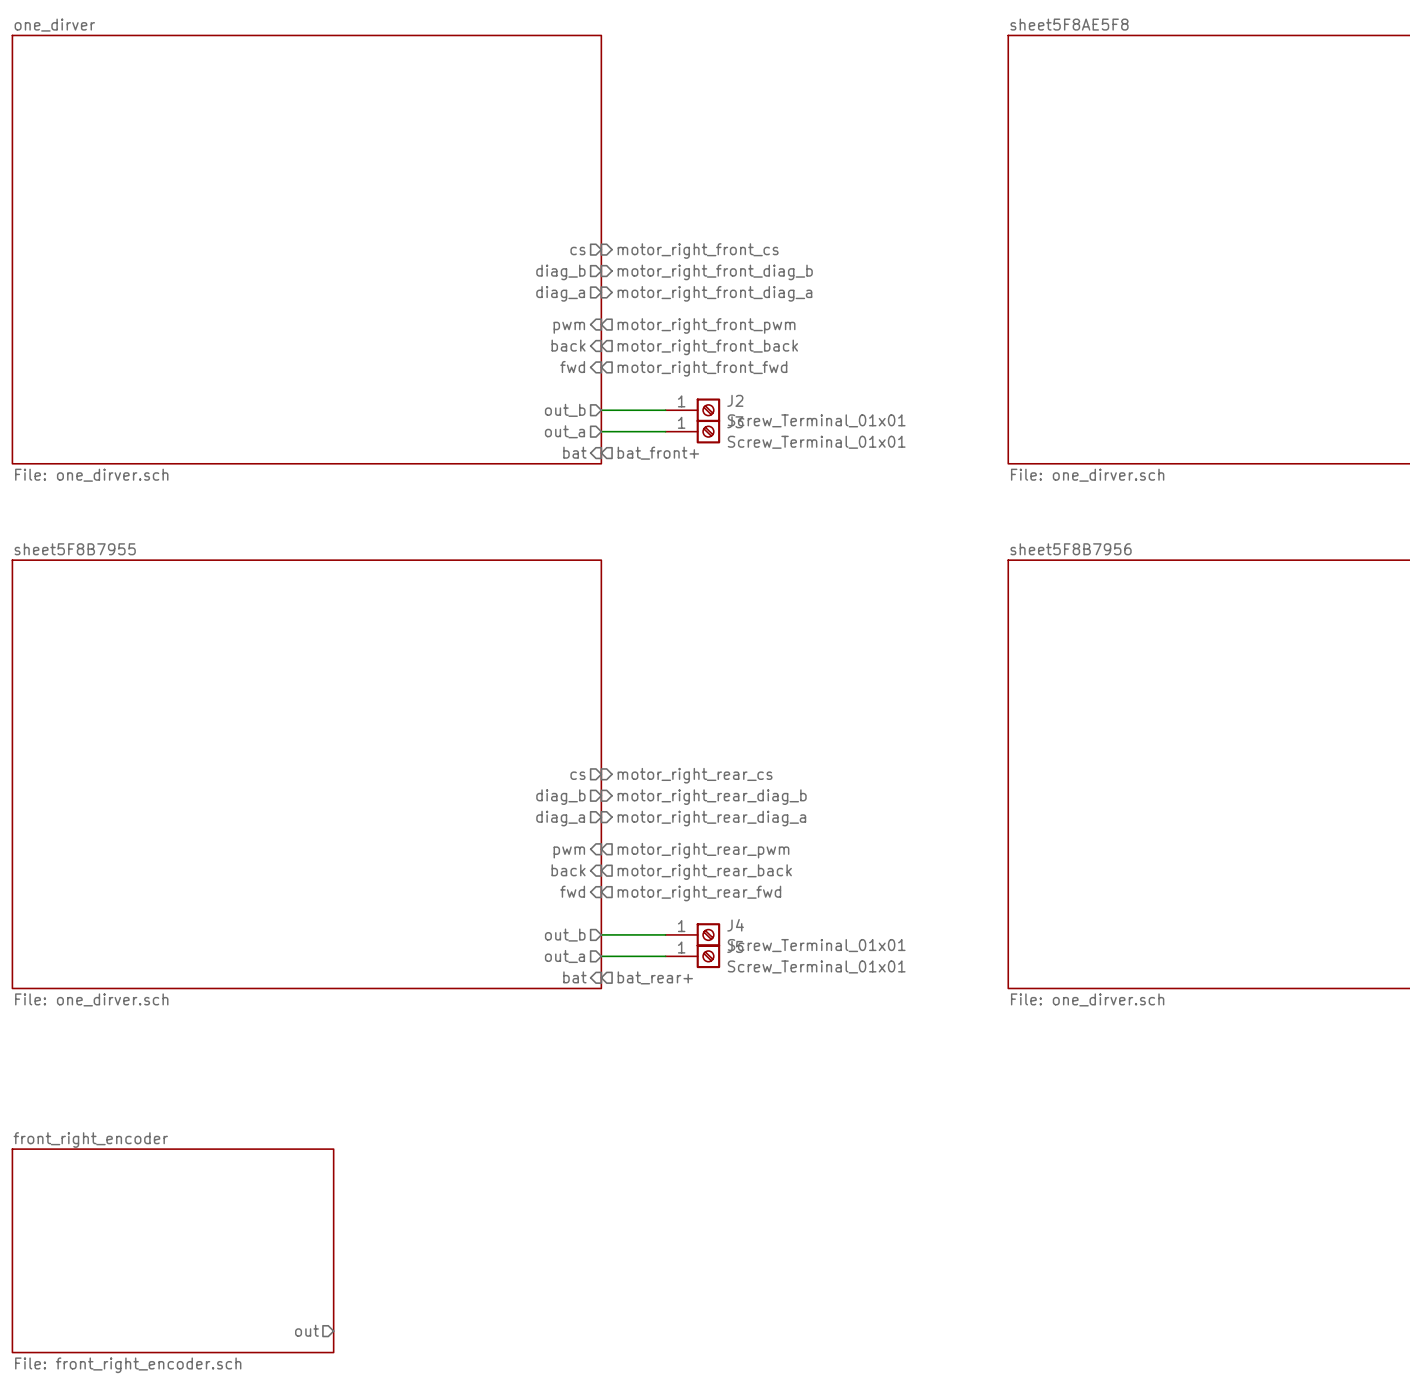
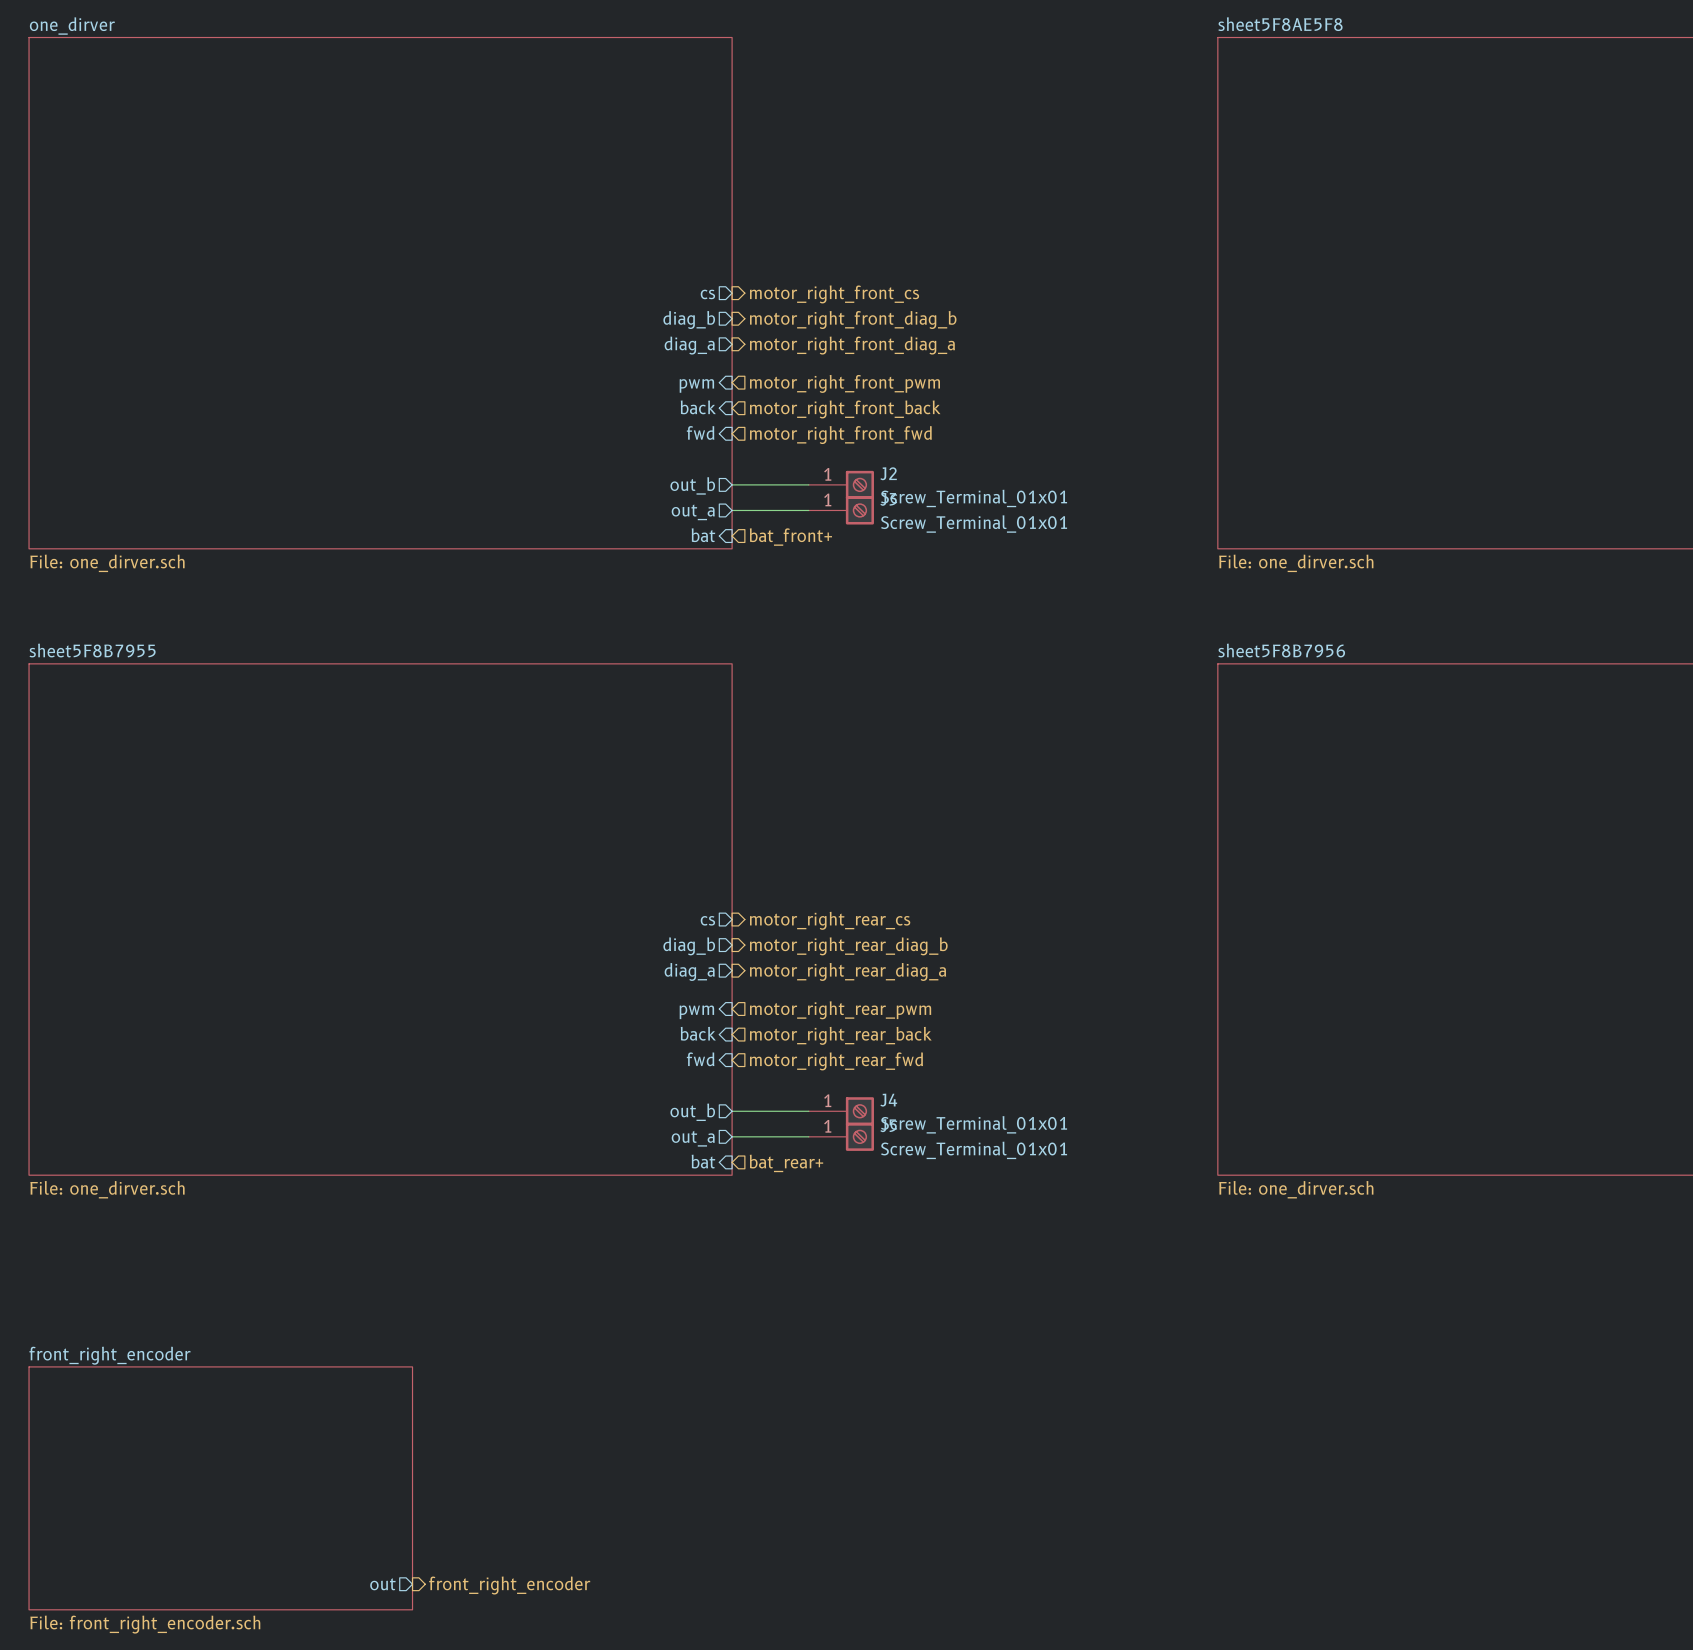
hierarchical label: none -> front_right_encoder (509, 1585)

